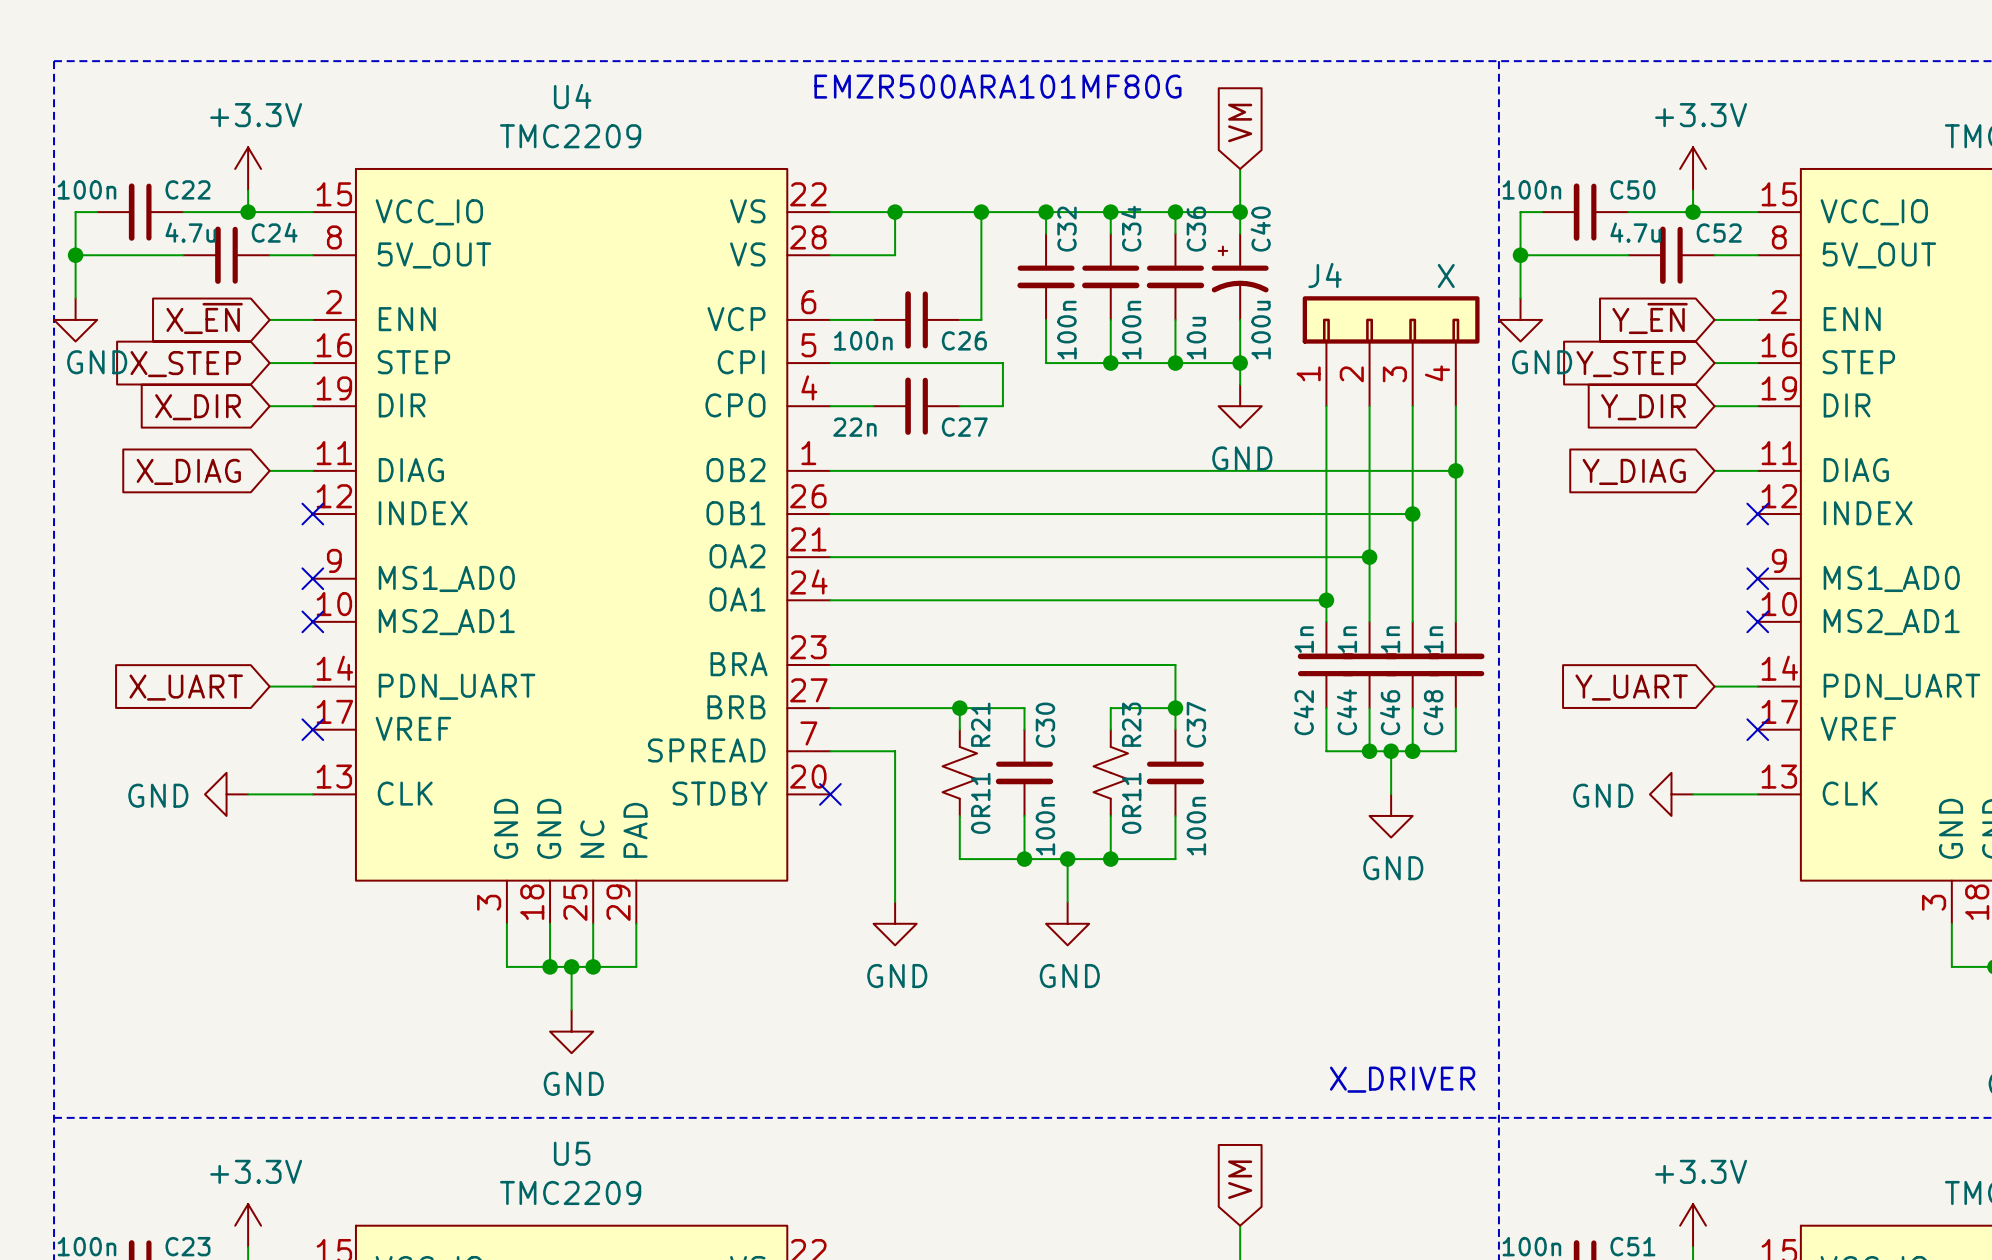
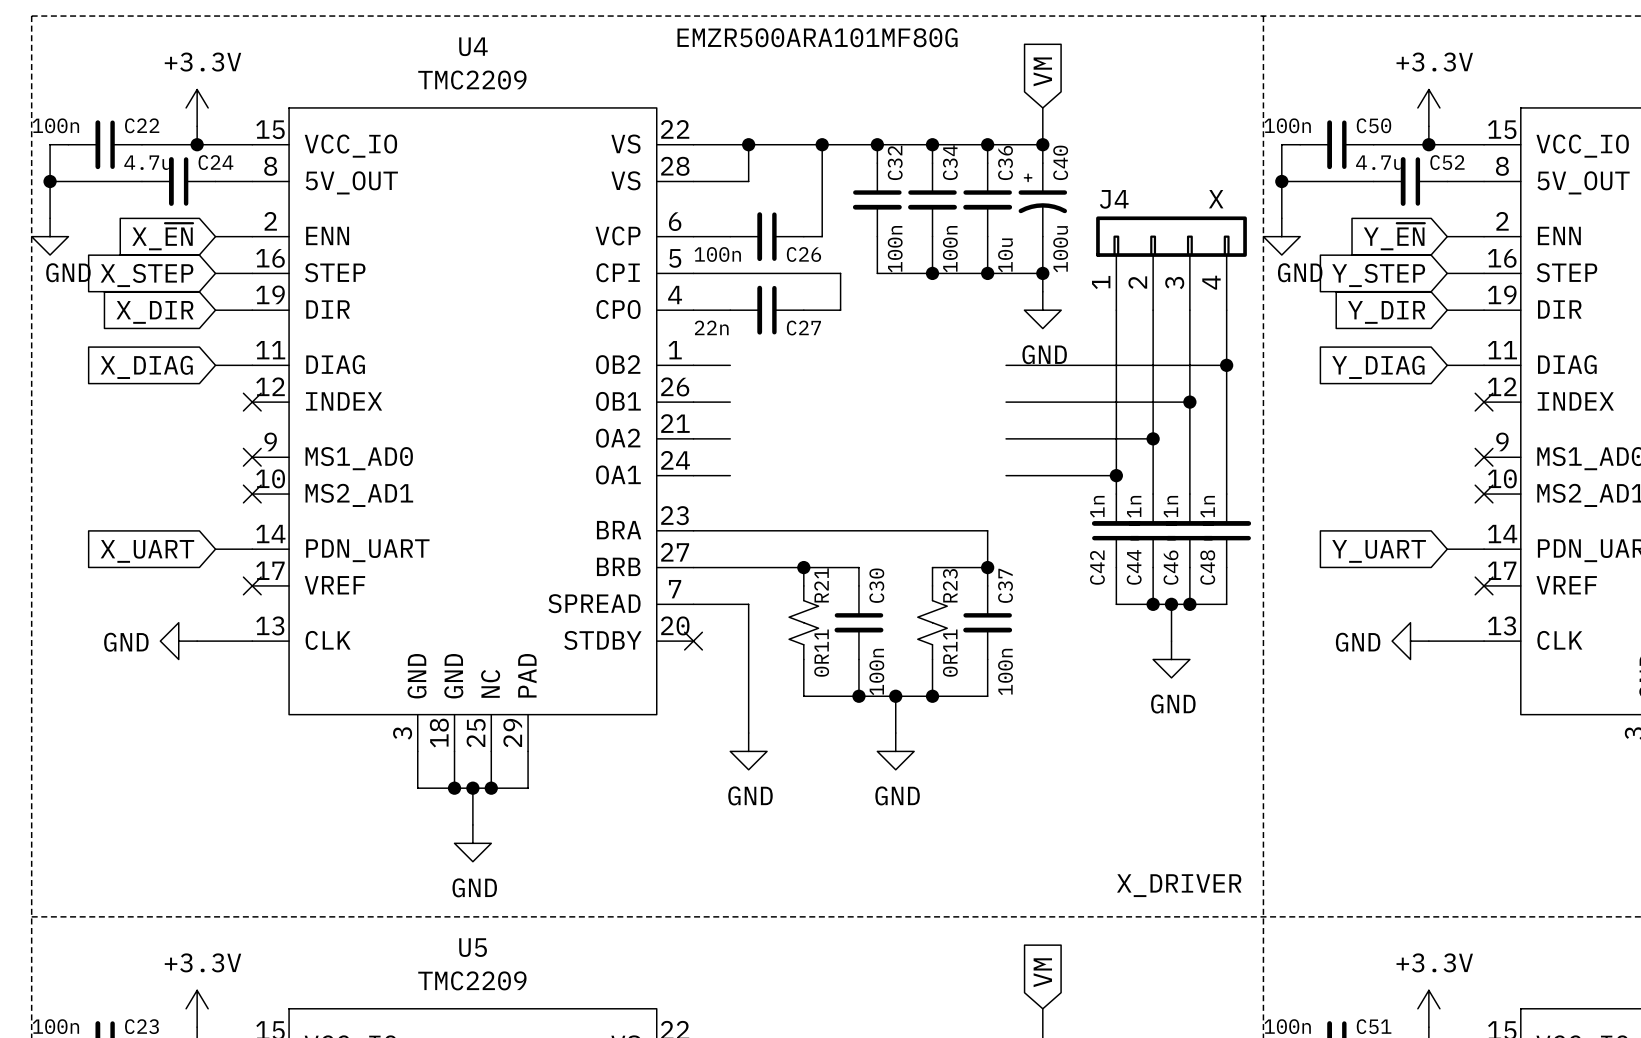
wire: (873, 470) (1197, 470) -> none
wire: (873, 514) (1197, 514) -> none
wire: (873, 557) (1197, 557) -> none
wire: (873, 600) (1197, 600) -> none

